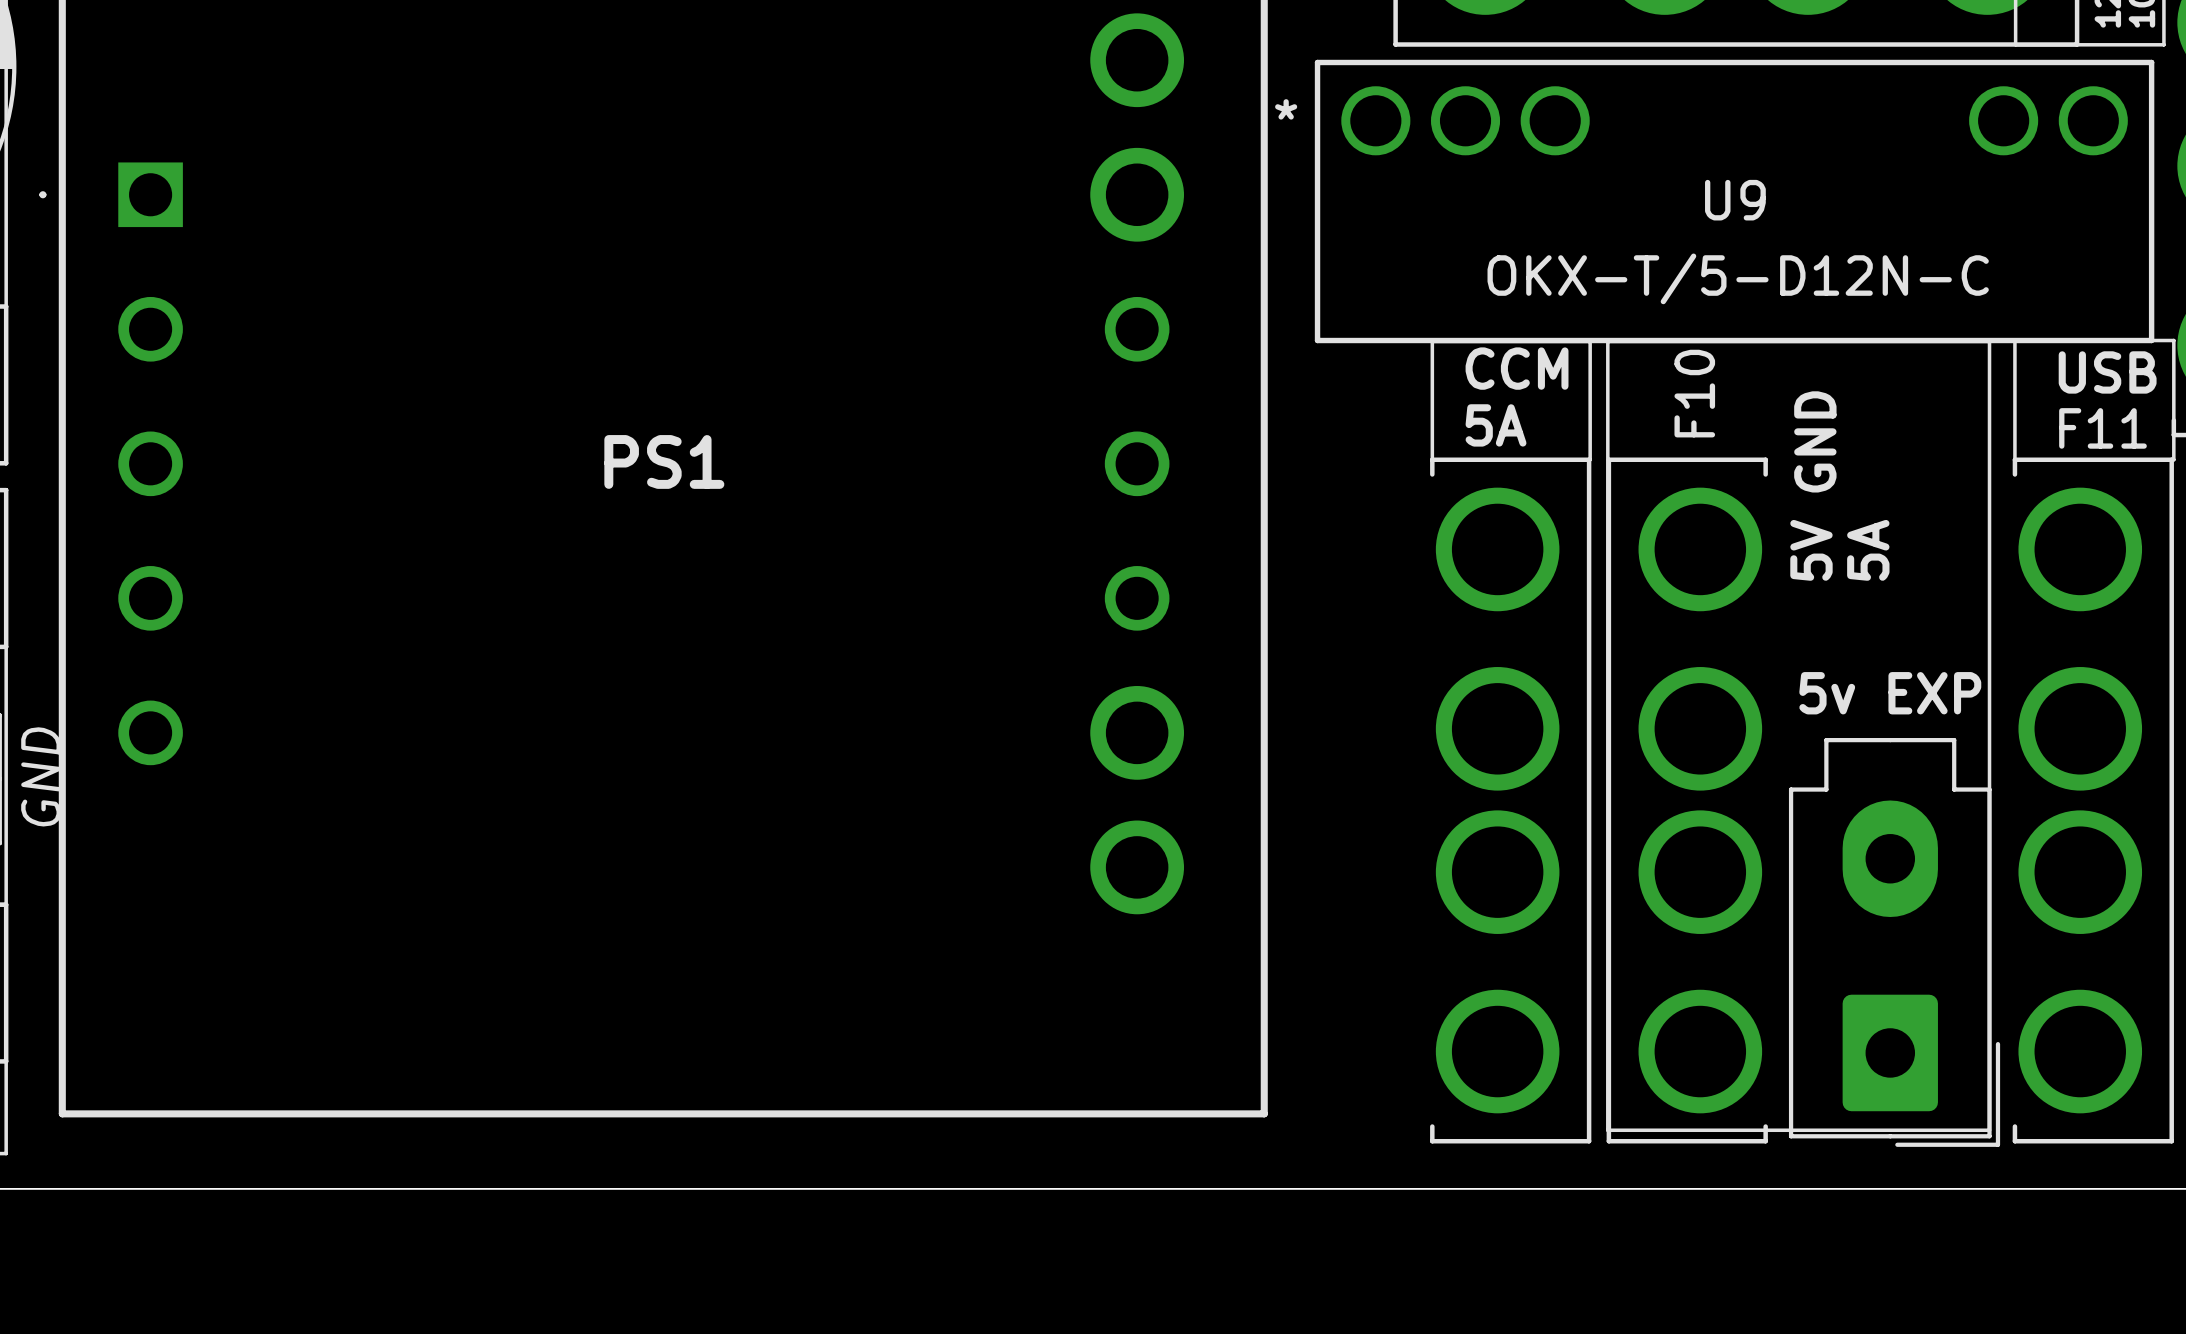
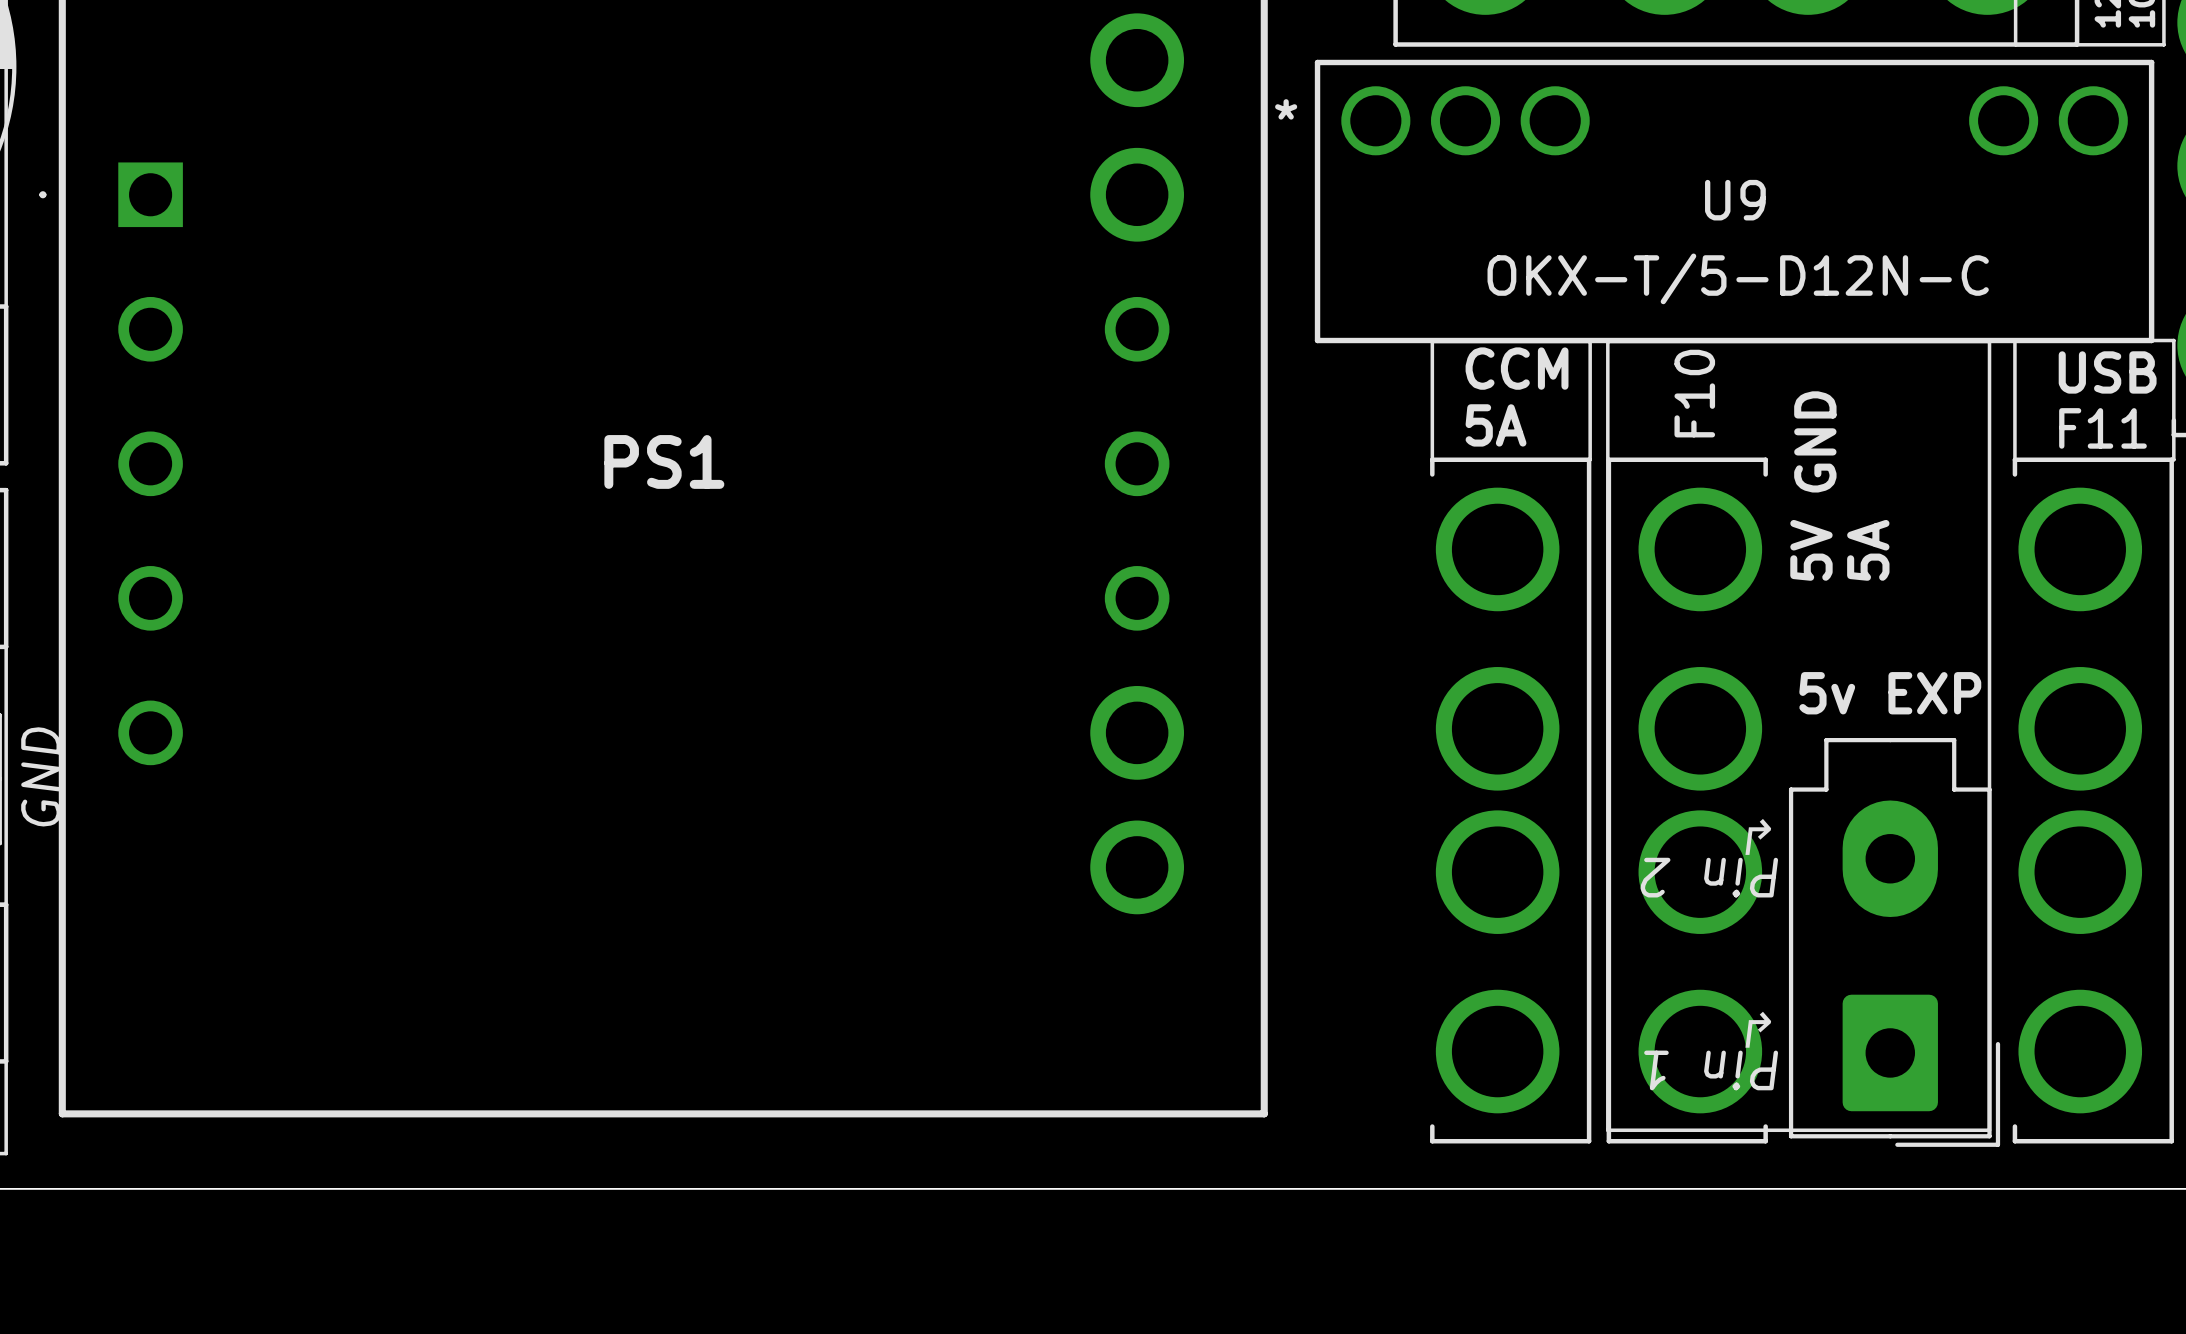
part text: none -> ↲ (1758, 836)
part text: none -> Pin 2 (1709, 877)
part text: none -> ↲ (1758, 1029)
part text: none -> Pin 1 (1711, 1070)

